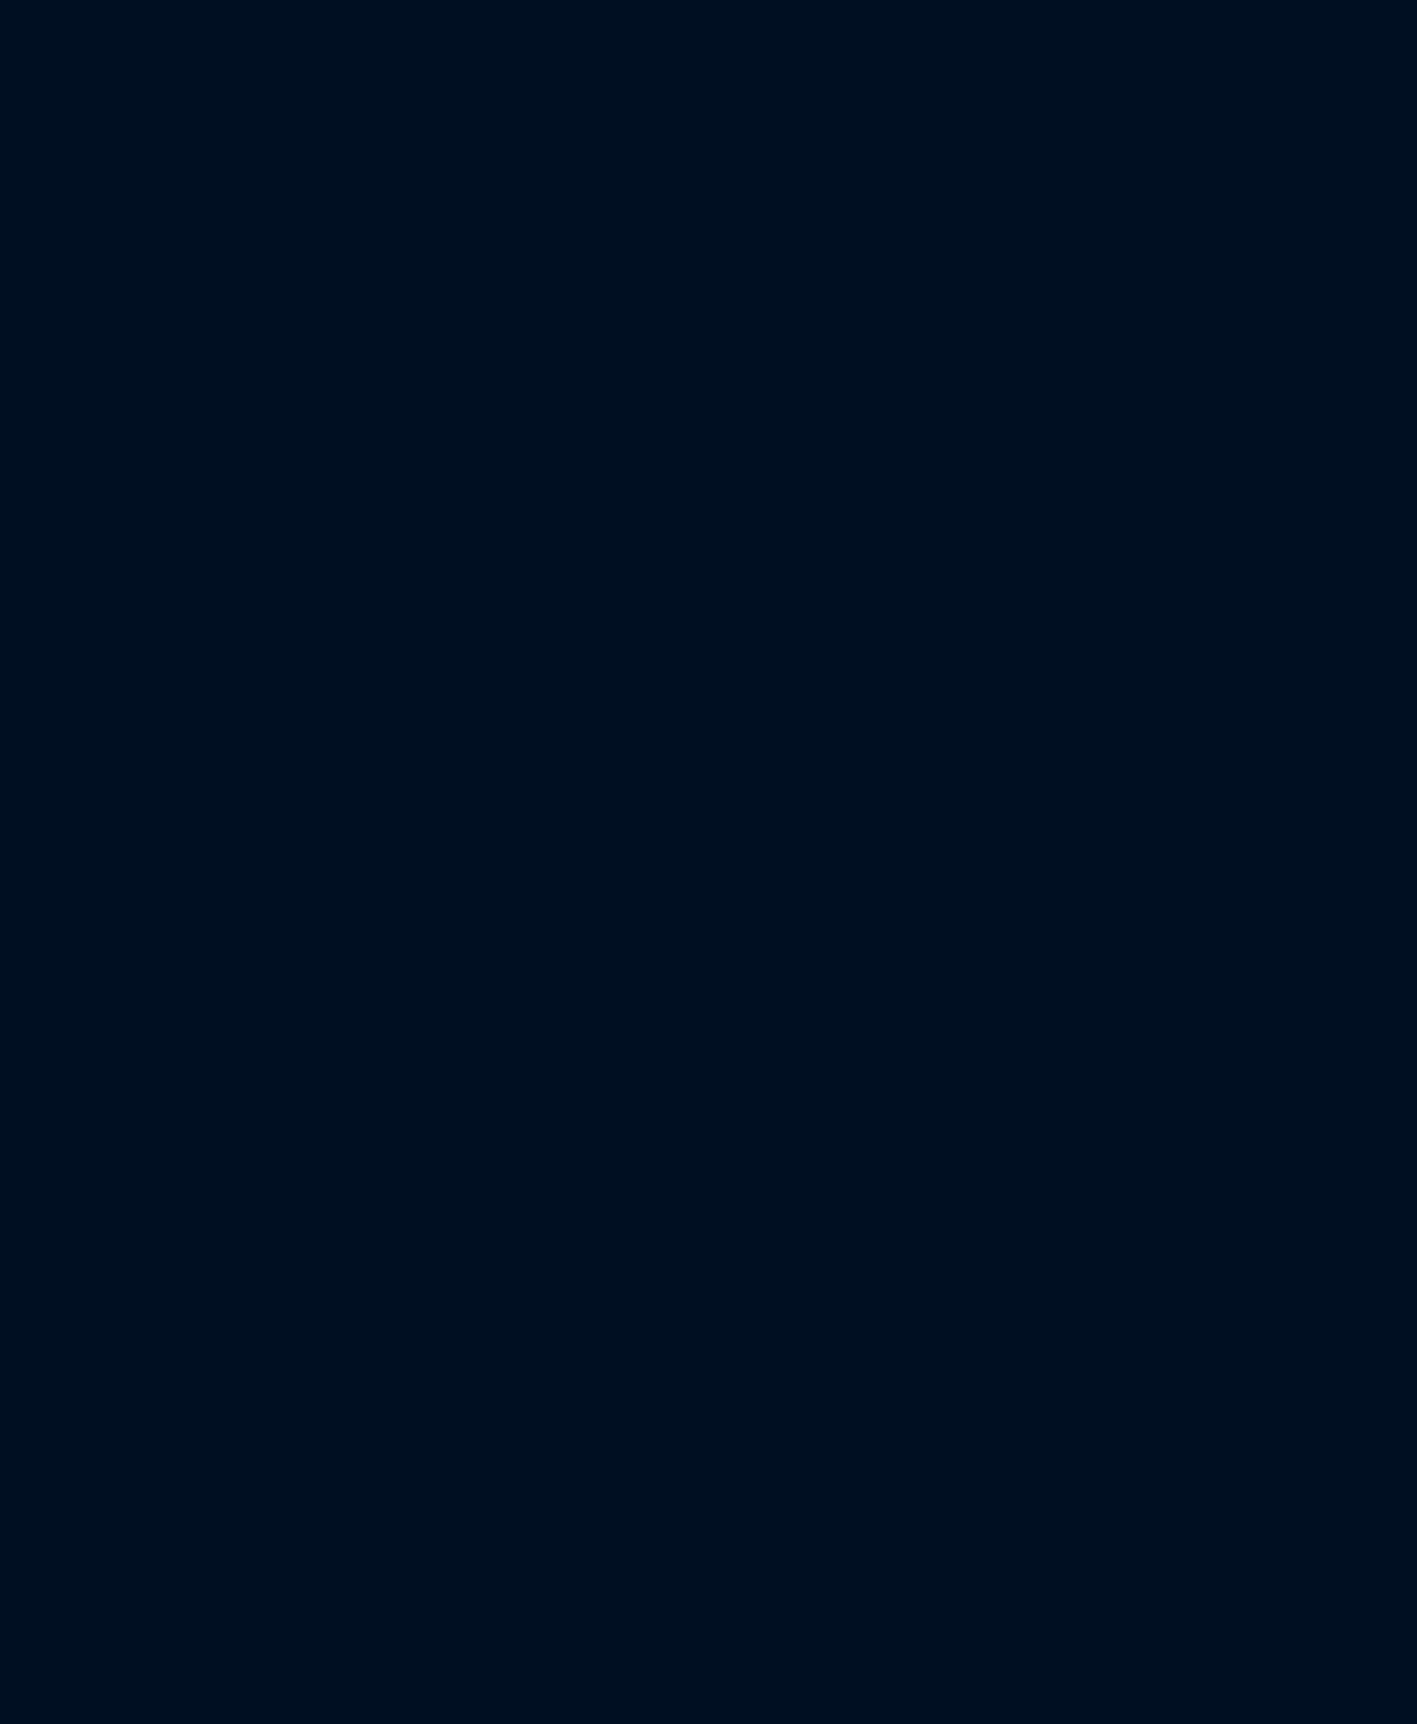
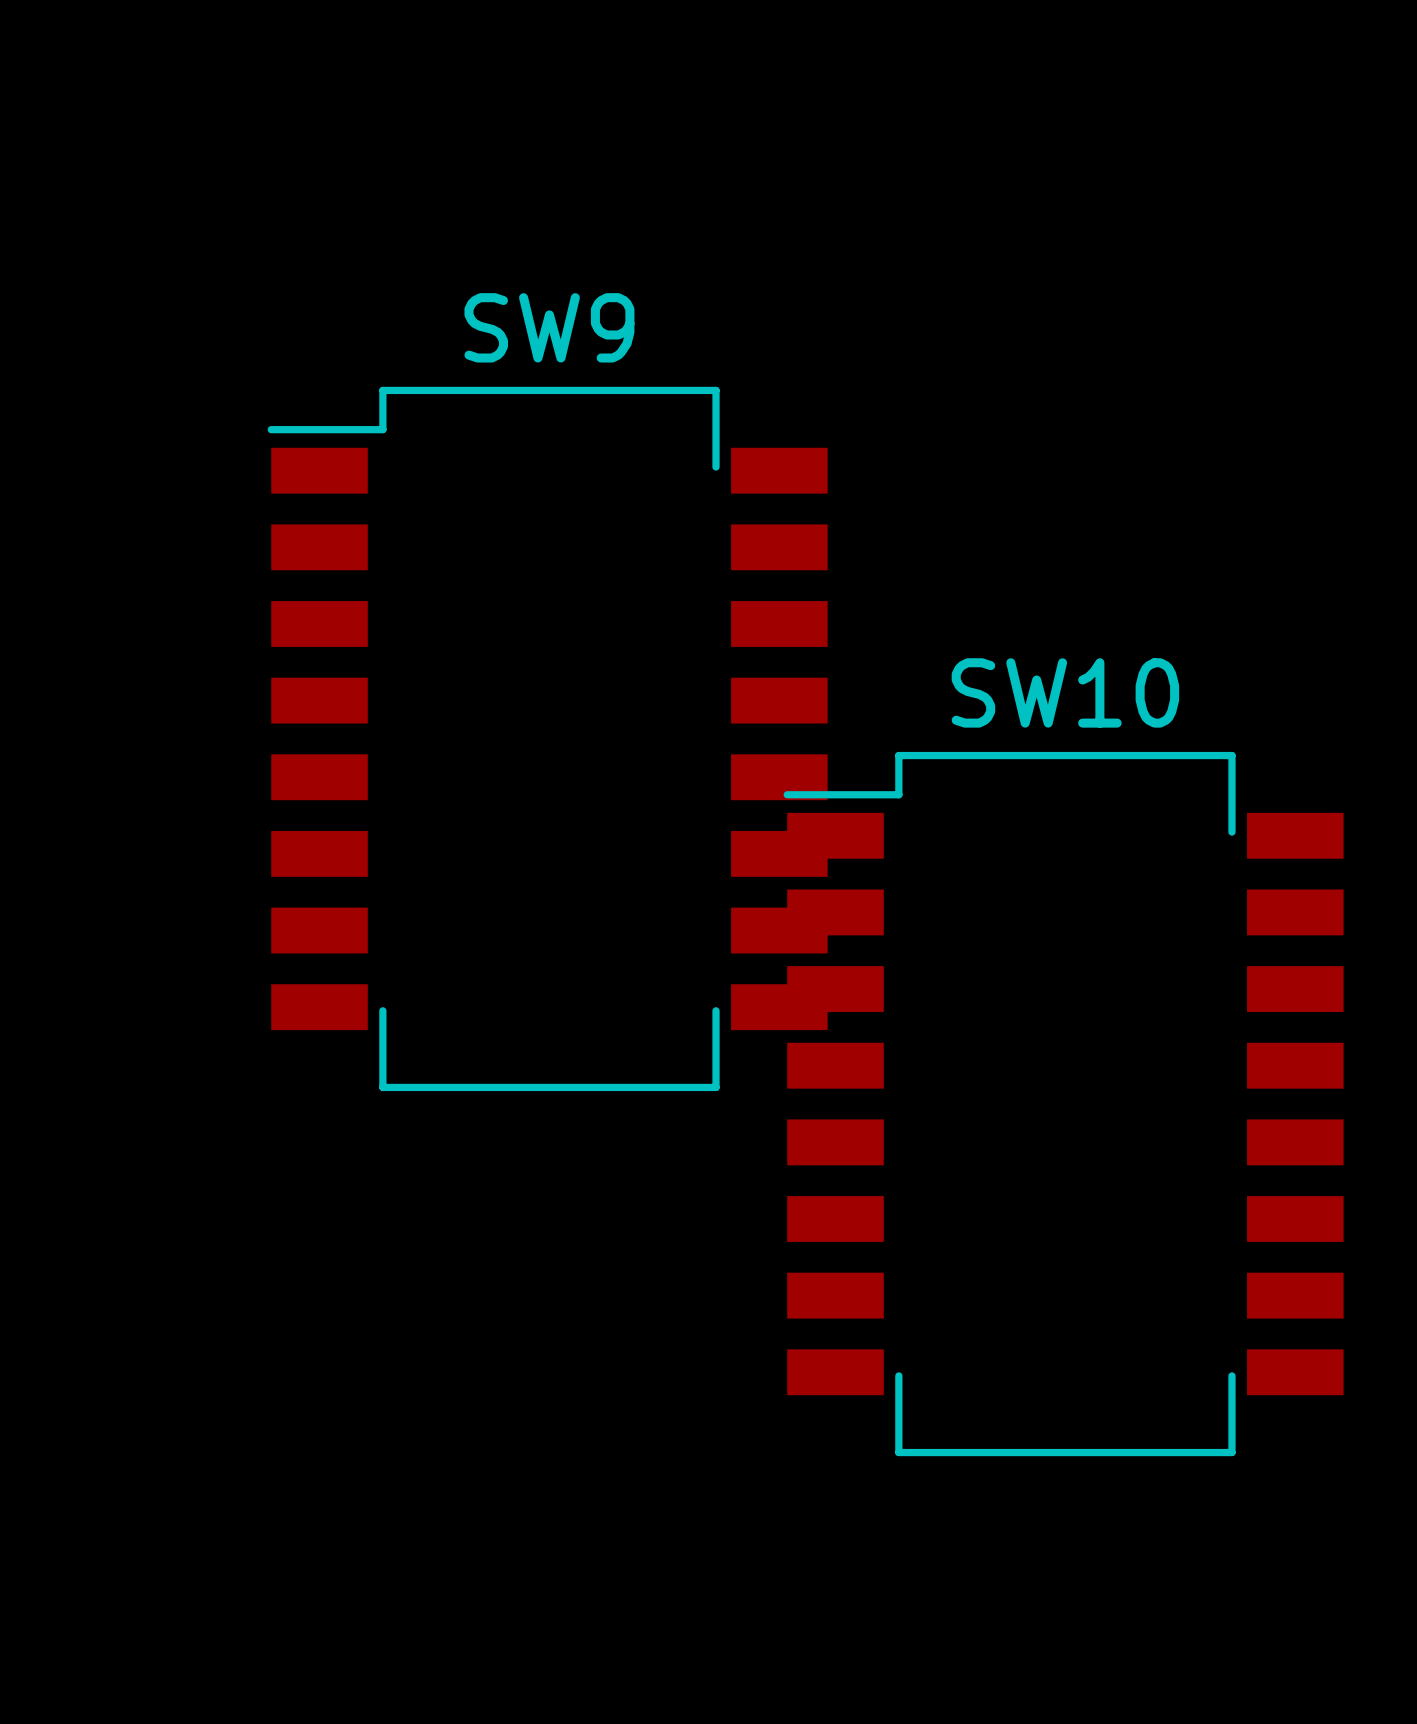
SW9: none -> (547, 738)
SW10: none -> (1063, 1104)

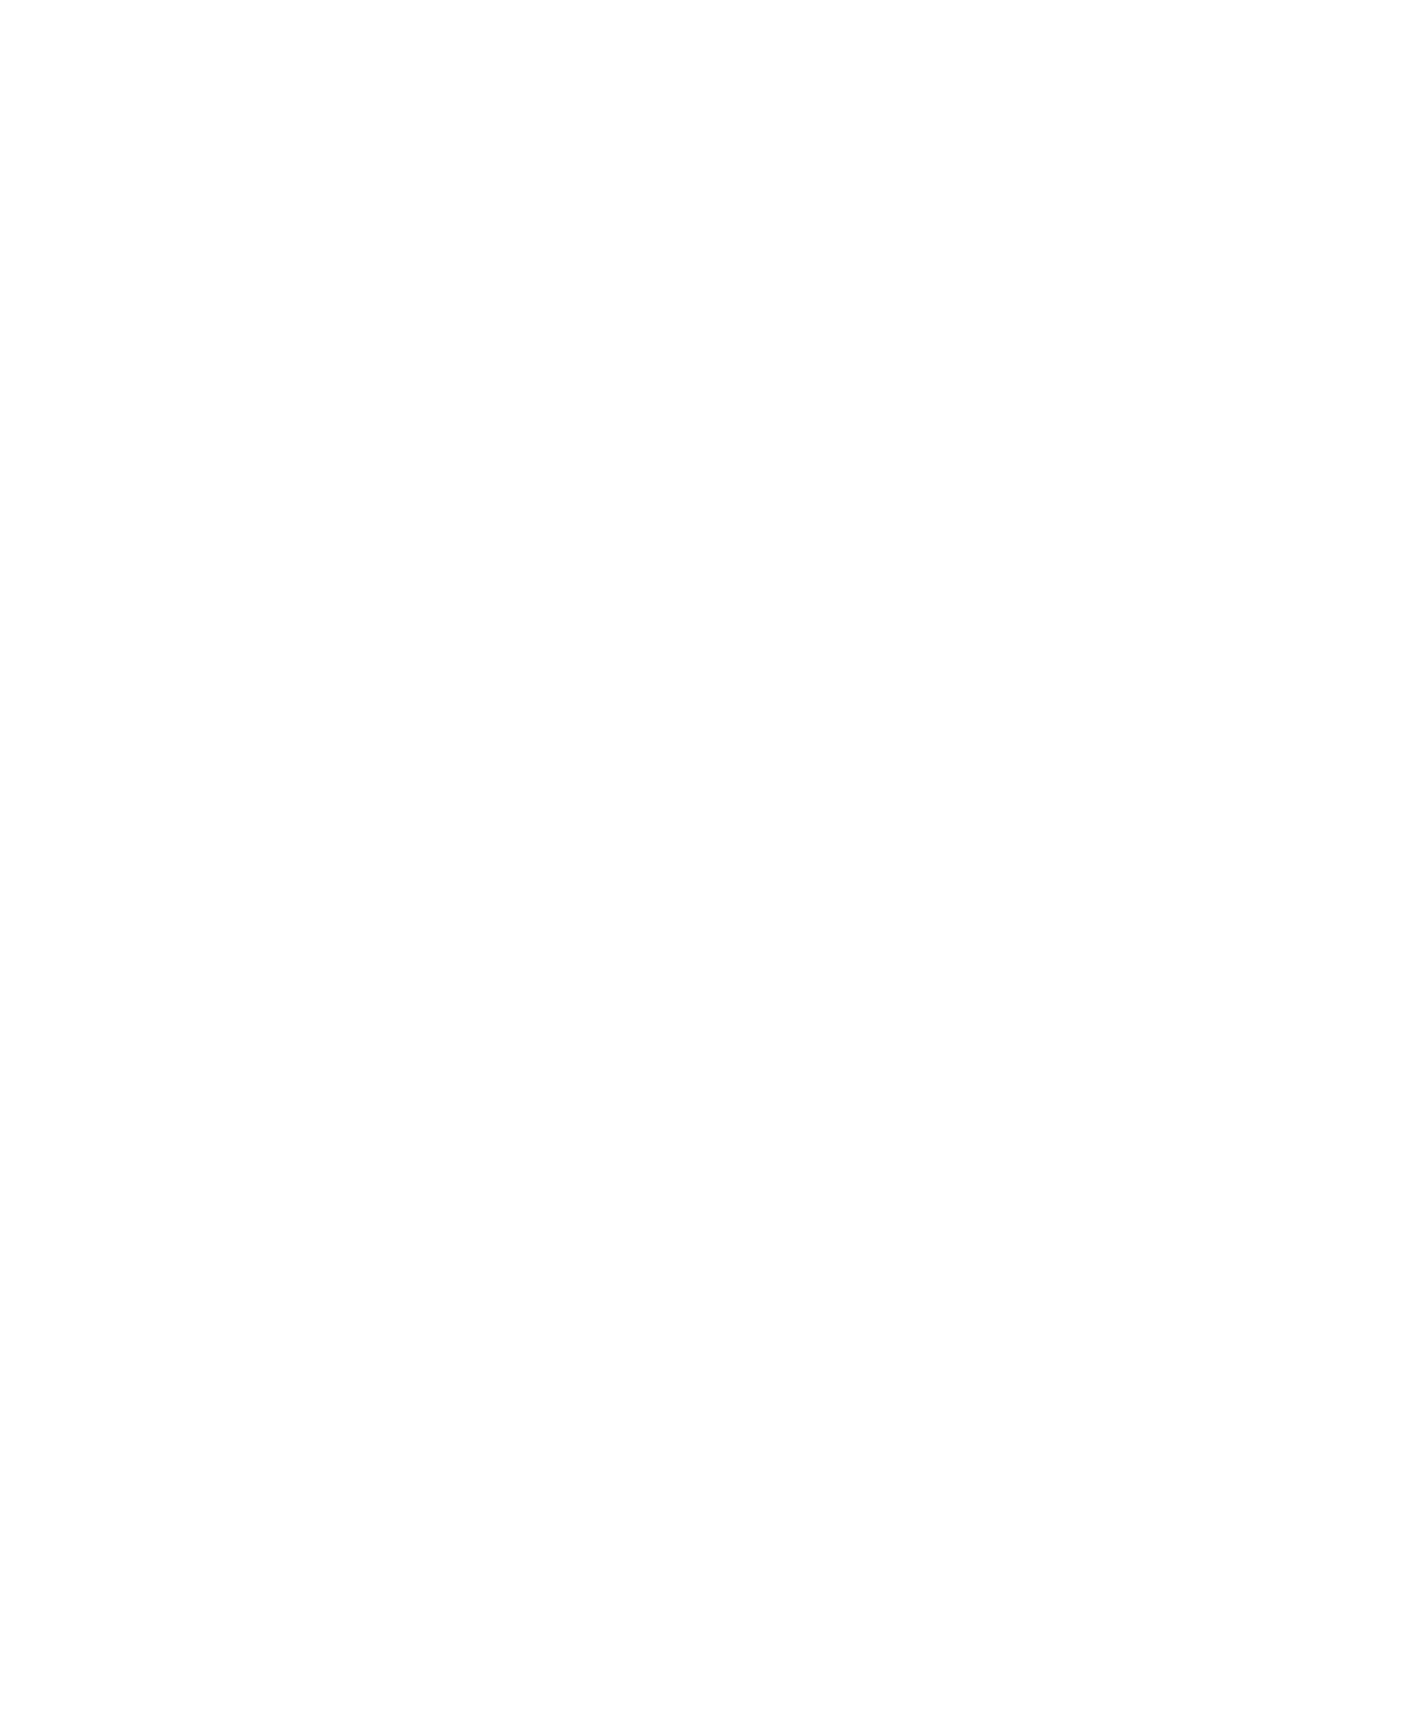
SW9: (547, 738) -> none
SW10: (1063, 1104) -> none

